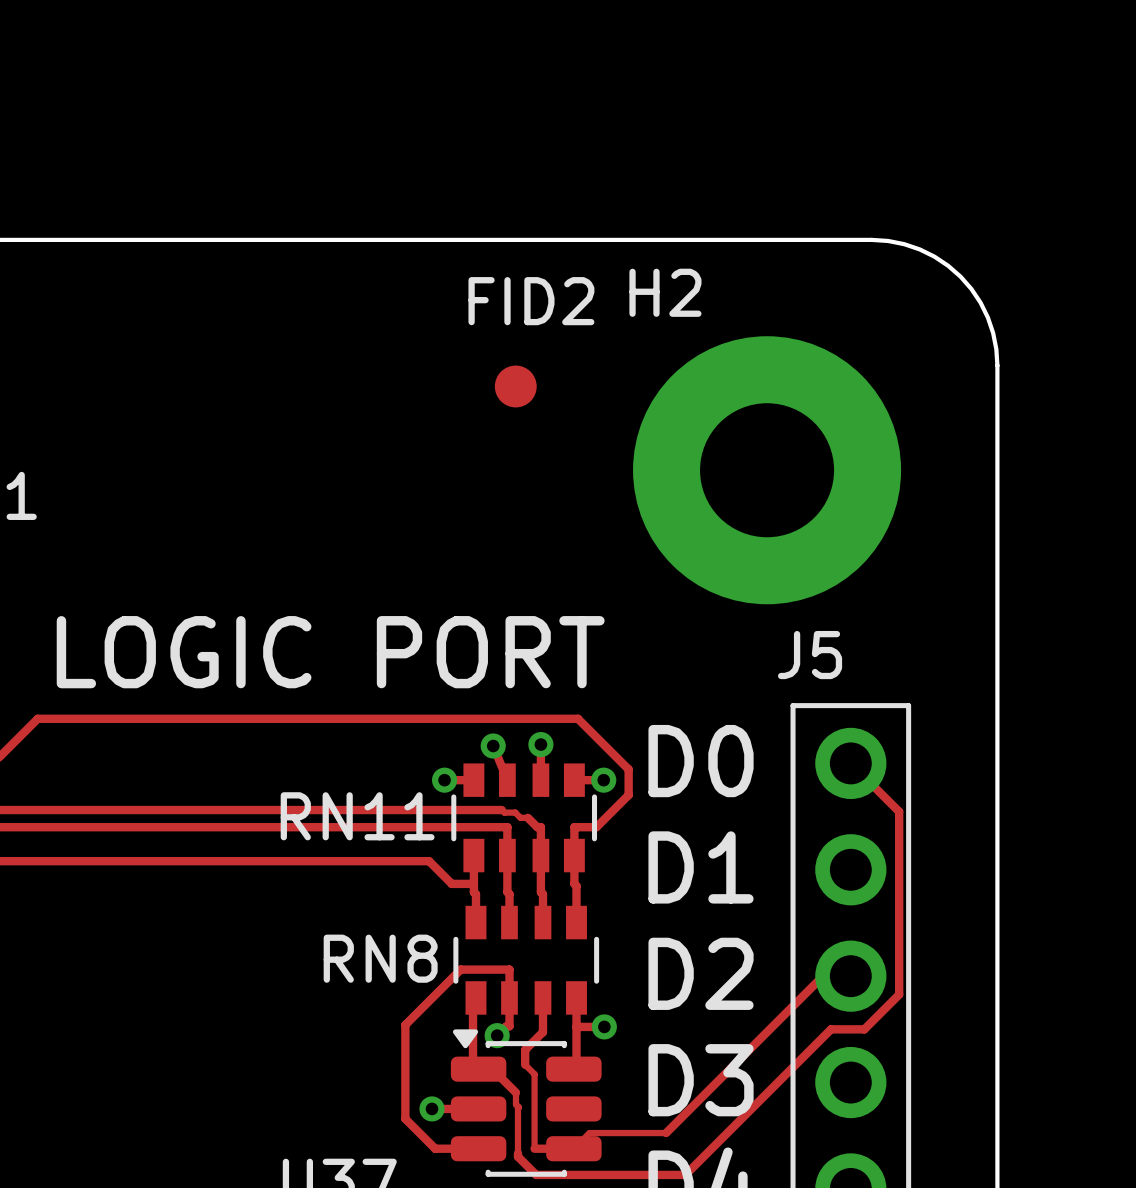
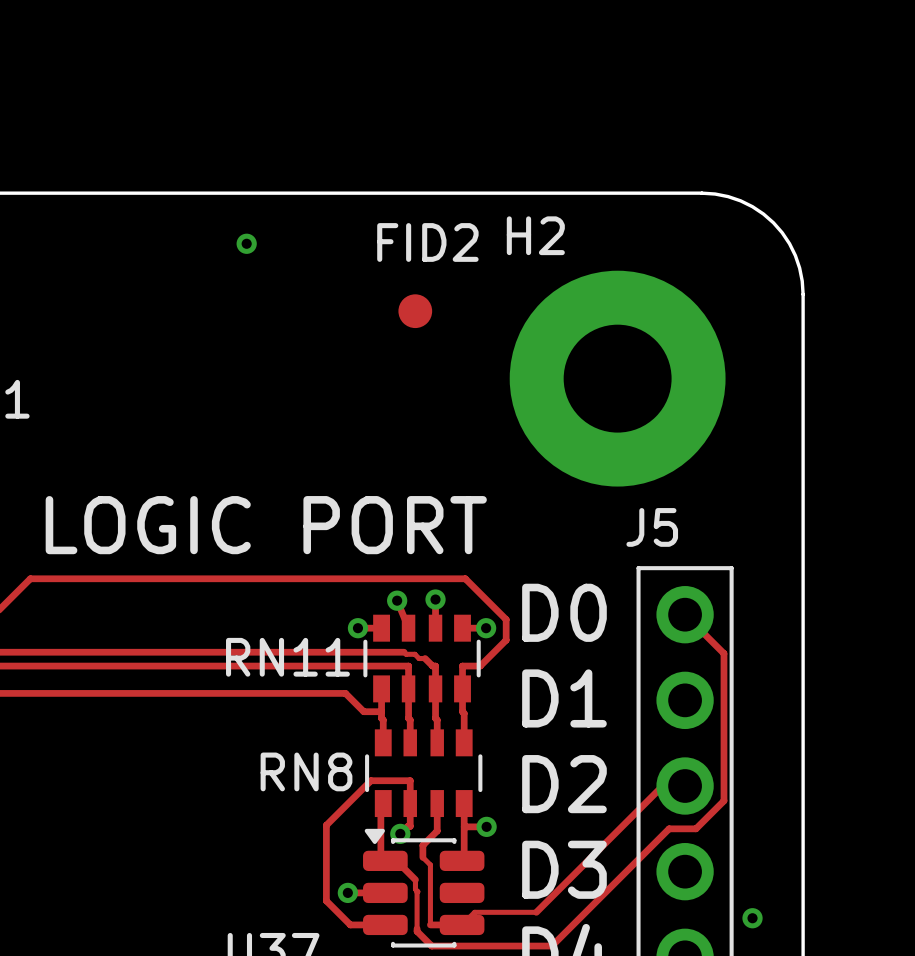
via: none -> (246, 243)
via: none -> (752, 918)

